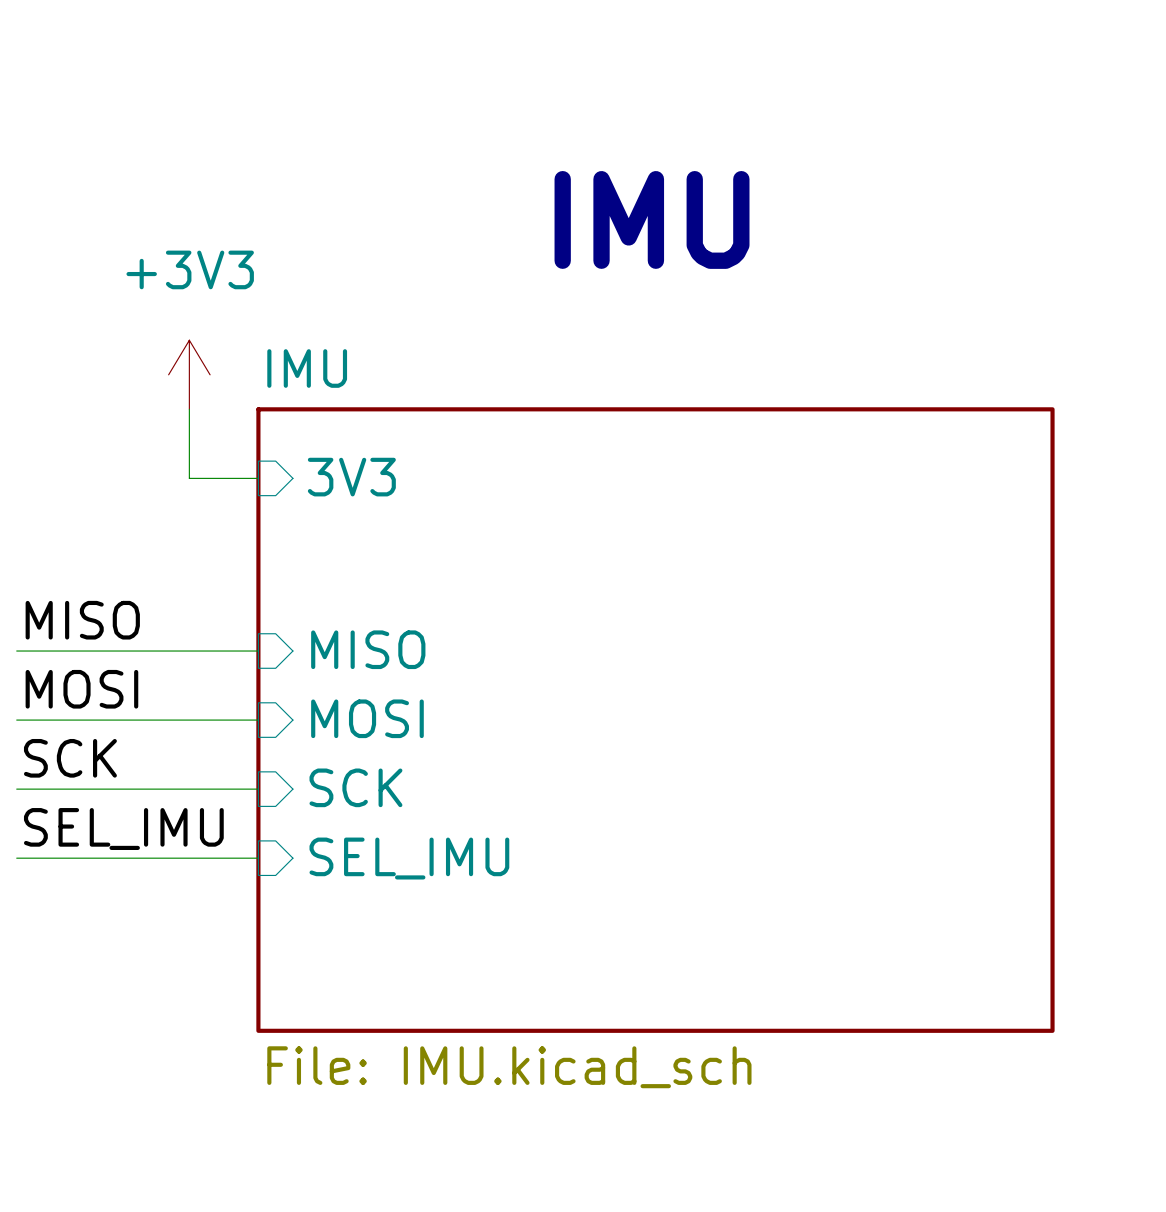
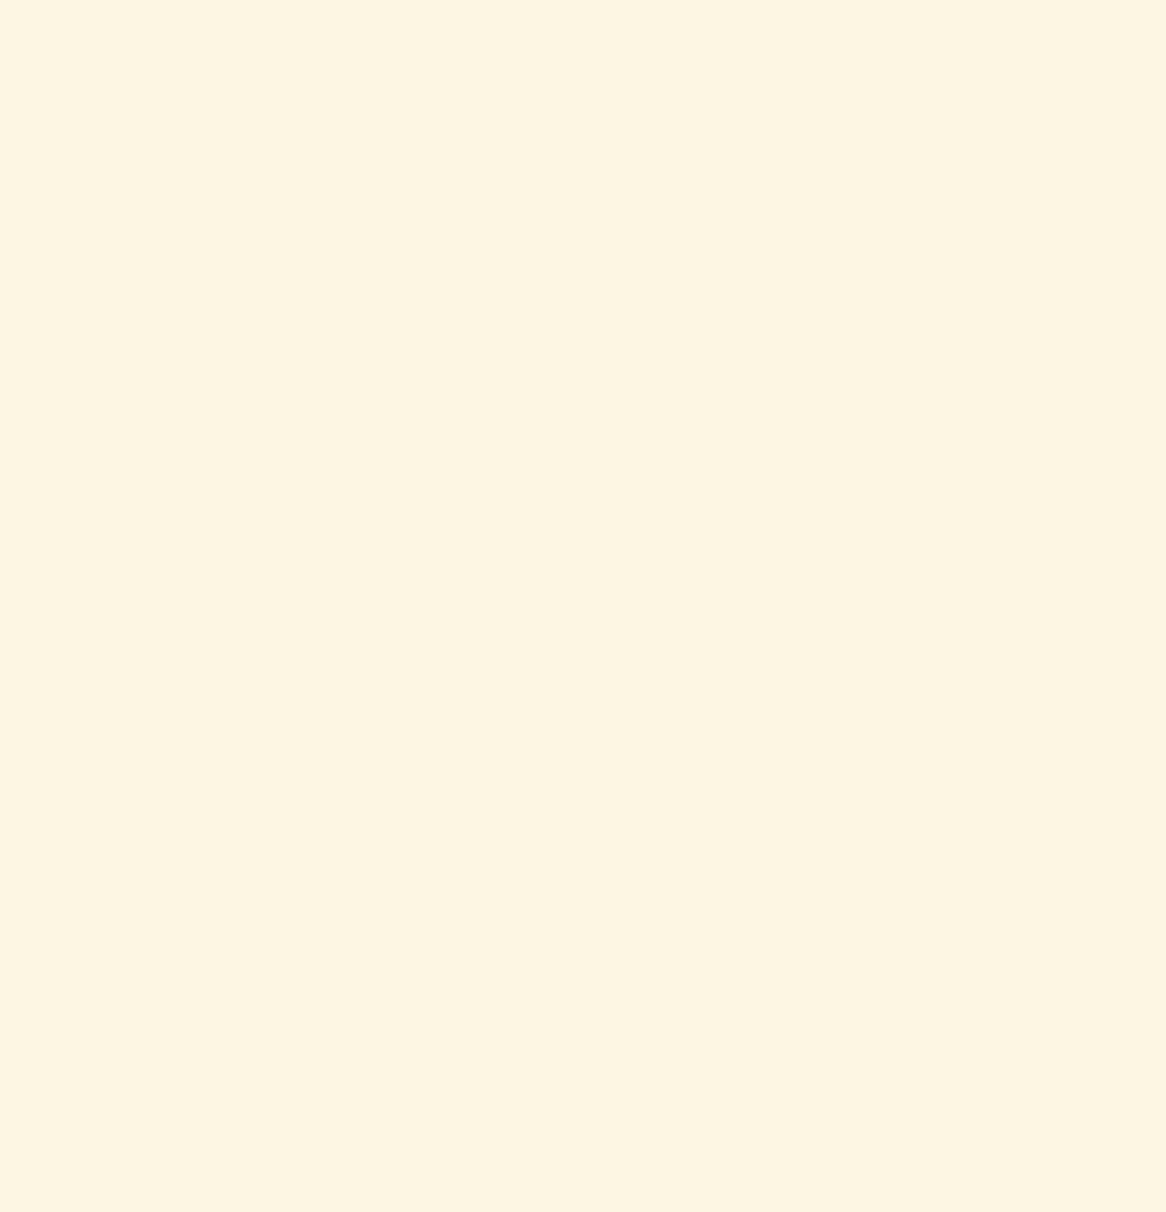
text: IMU (652, 219) -> none
power symbol: +3V3 (189, 374) -> none
wire: (189, 409) (189, 478) (258, 478) -> none
sheet pin: 3V3 (351, 477) -> none
label: MISO (82, 620) -> none
sheet pin: MISO (368, 649) -> none
wire: (16, 651) (258, 651) -> none
label: MOSI (81, 689) -> none
sheet pin: MOSI (367, 718) -> none
wire: (16, 720) (258, 720) -> none
sheet IMU: File: IMU.kicad_sch (655, 720) -> none
label: SCK (70, 758) -> none
sheet pin: SCK (355, 787) -> none
wire: (16, 789) (258, 789) -> none
label: SEL_IMU (123, 829) -> none
wire: (16, 858) (258, 858) -> none
sheet pin: SEL_IMU (409, 858) -> none

